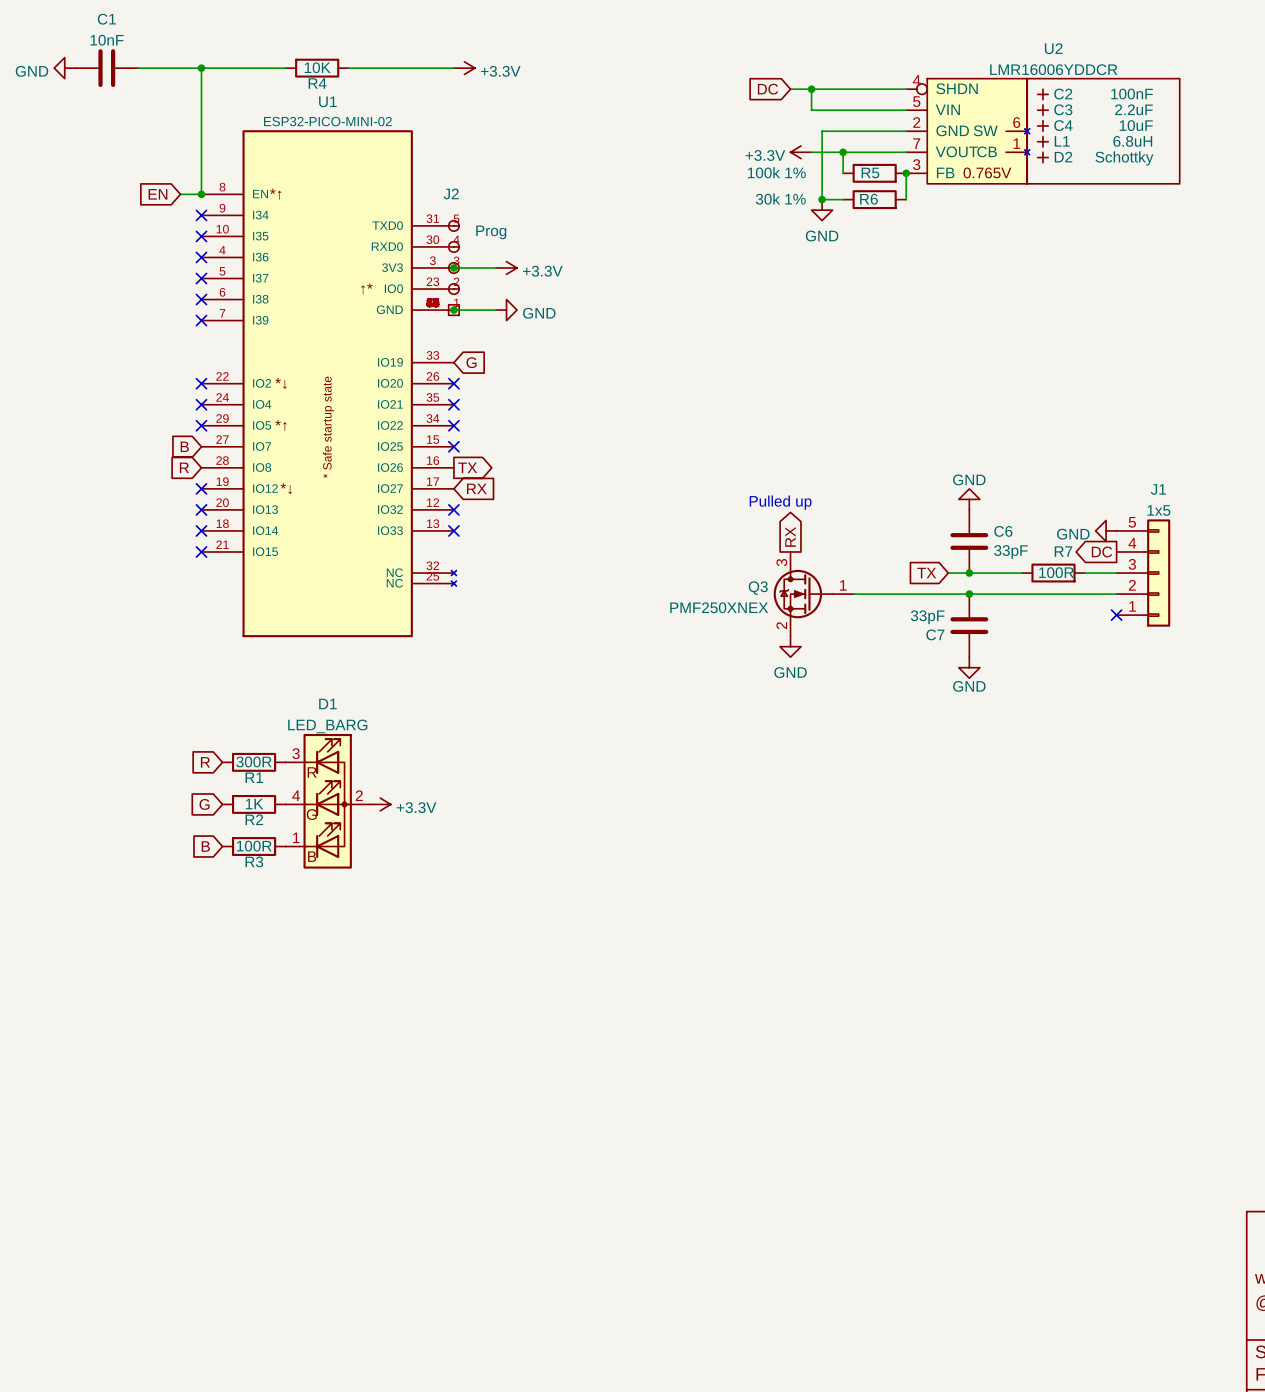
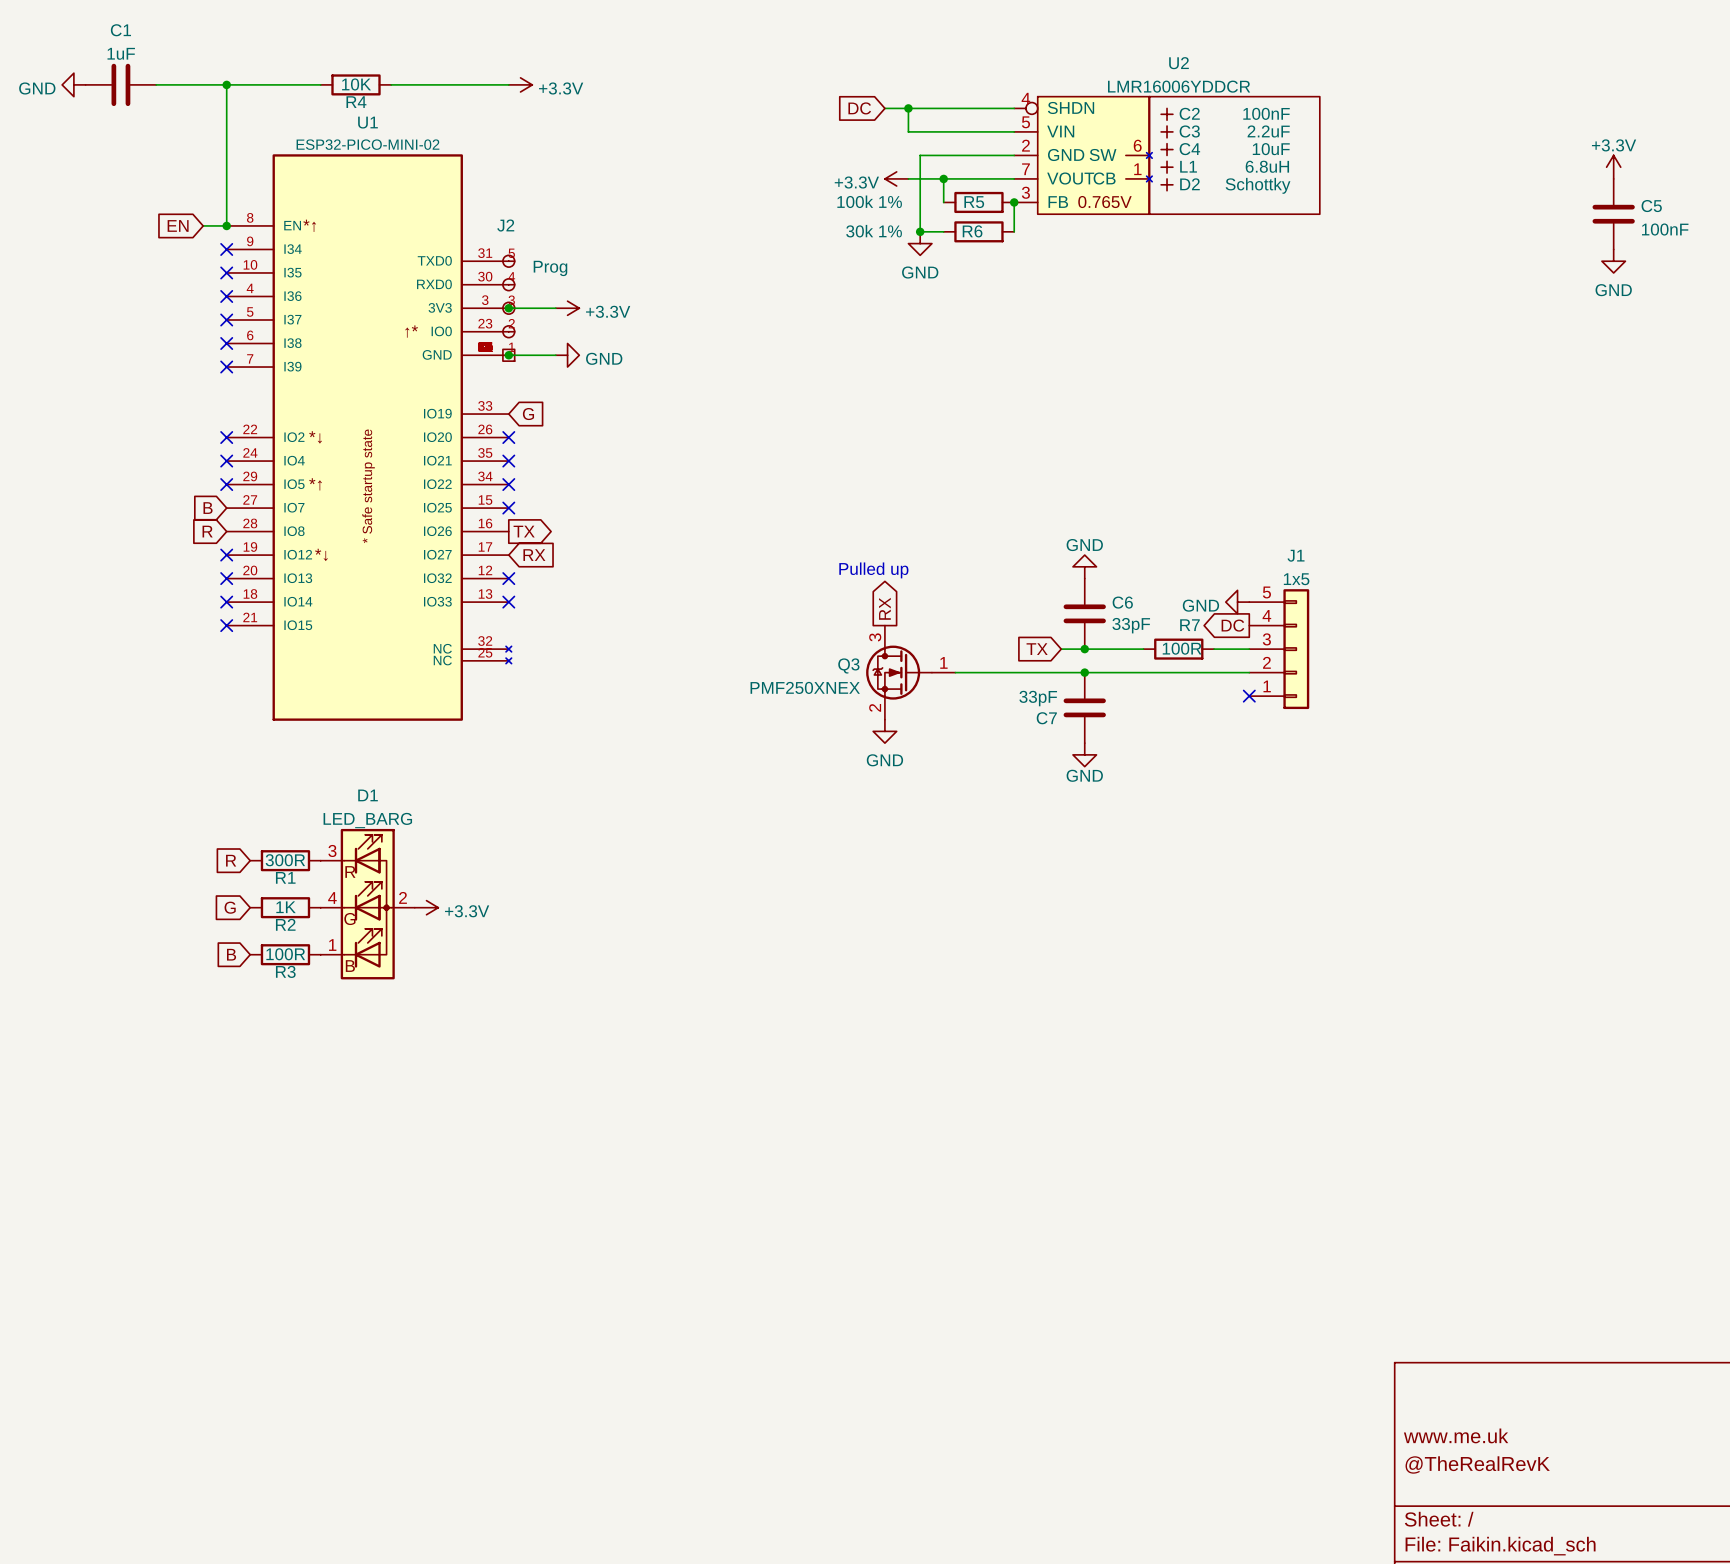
C1 value: 10nF (107, 40) -> 1uF (121, 53)

